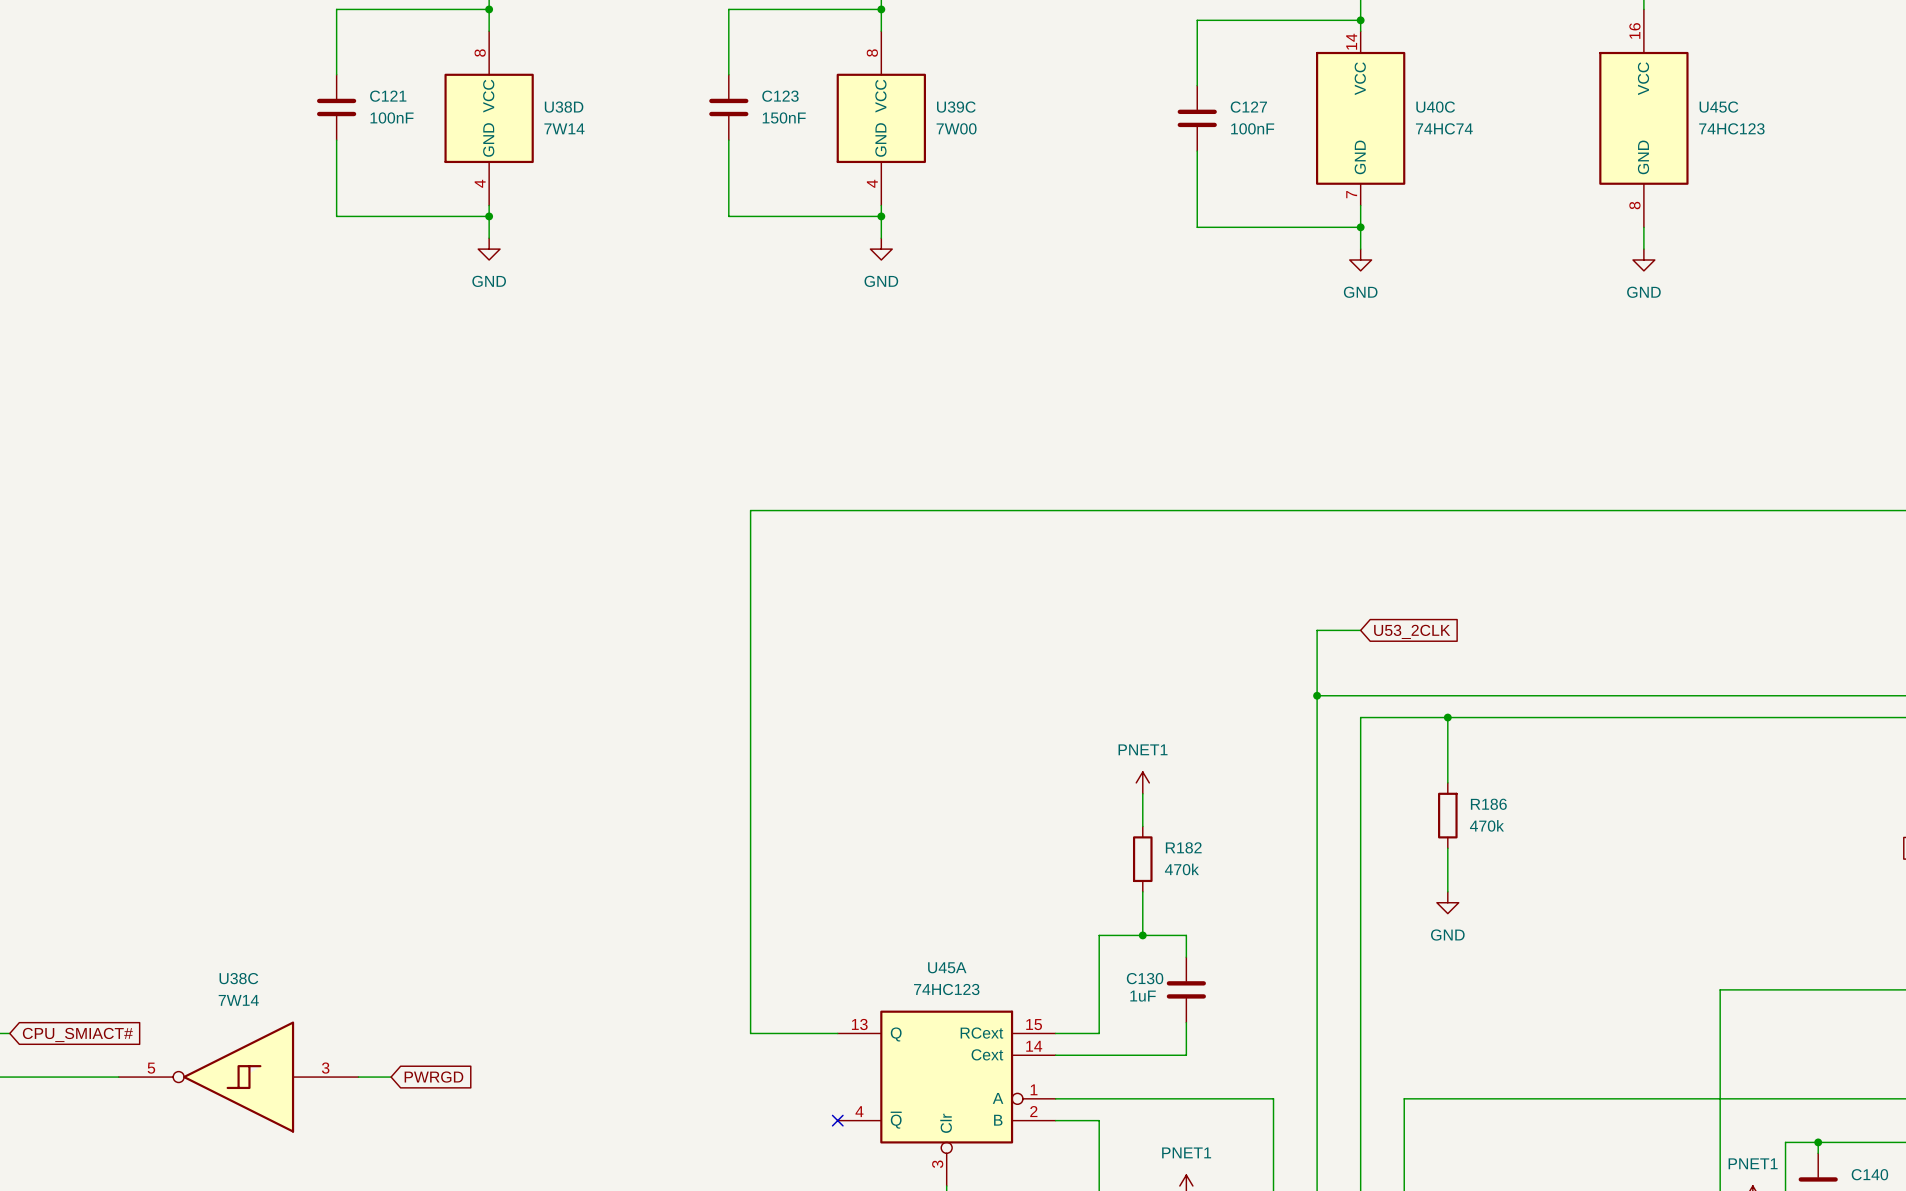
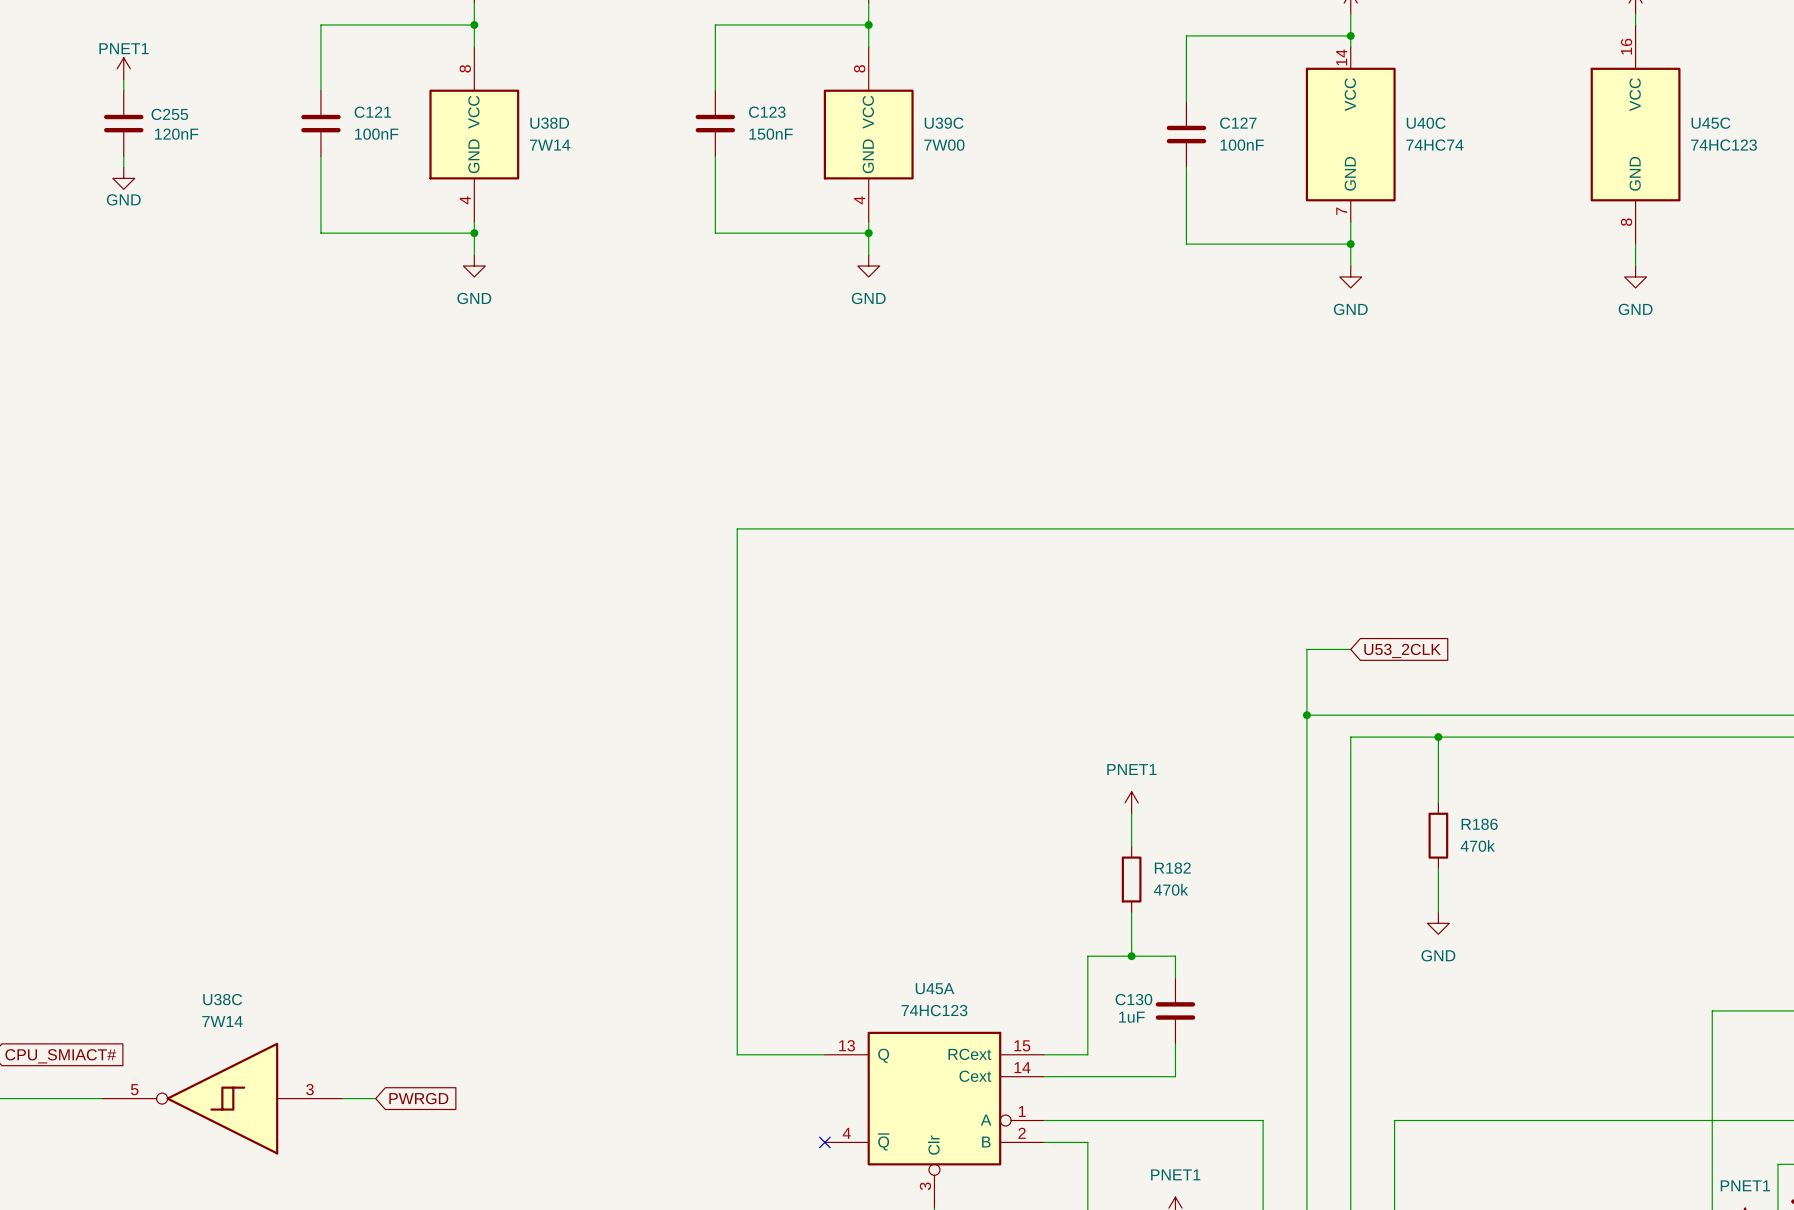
power symbol: none -> PNET1 (123, 68)
wire: none -> (123, 79) (123, 90)
C255: none -> 120nF (123, 123)
wire: none -> (123, 156) (123, 167)
power symbol: none -> GND (123, 178)

